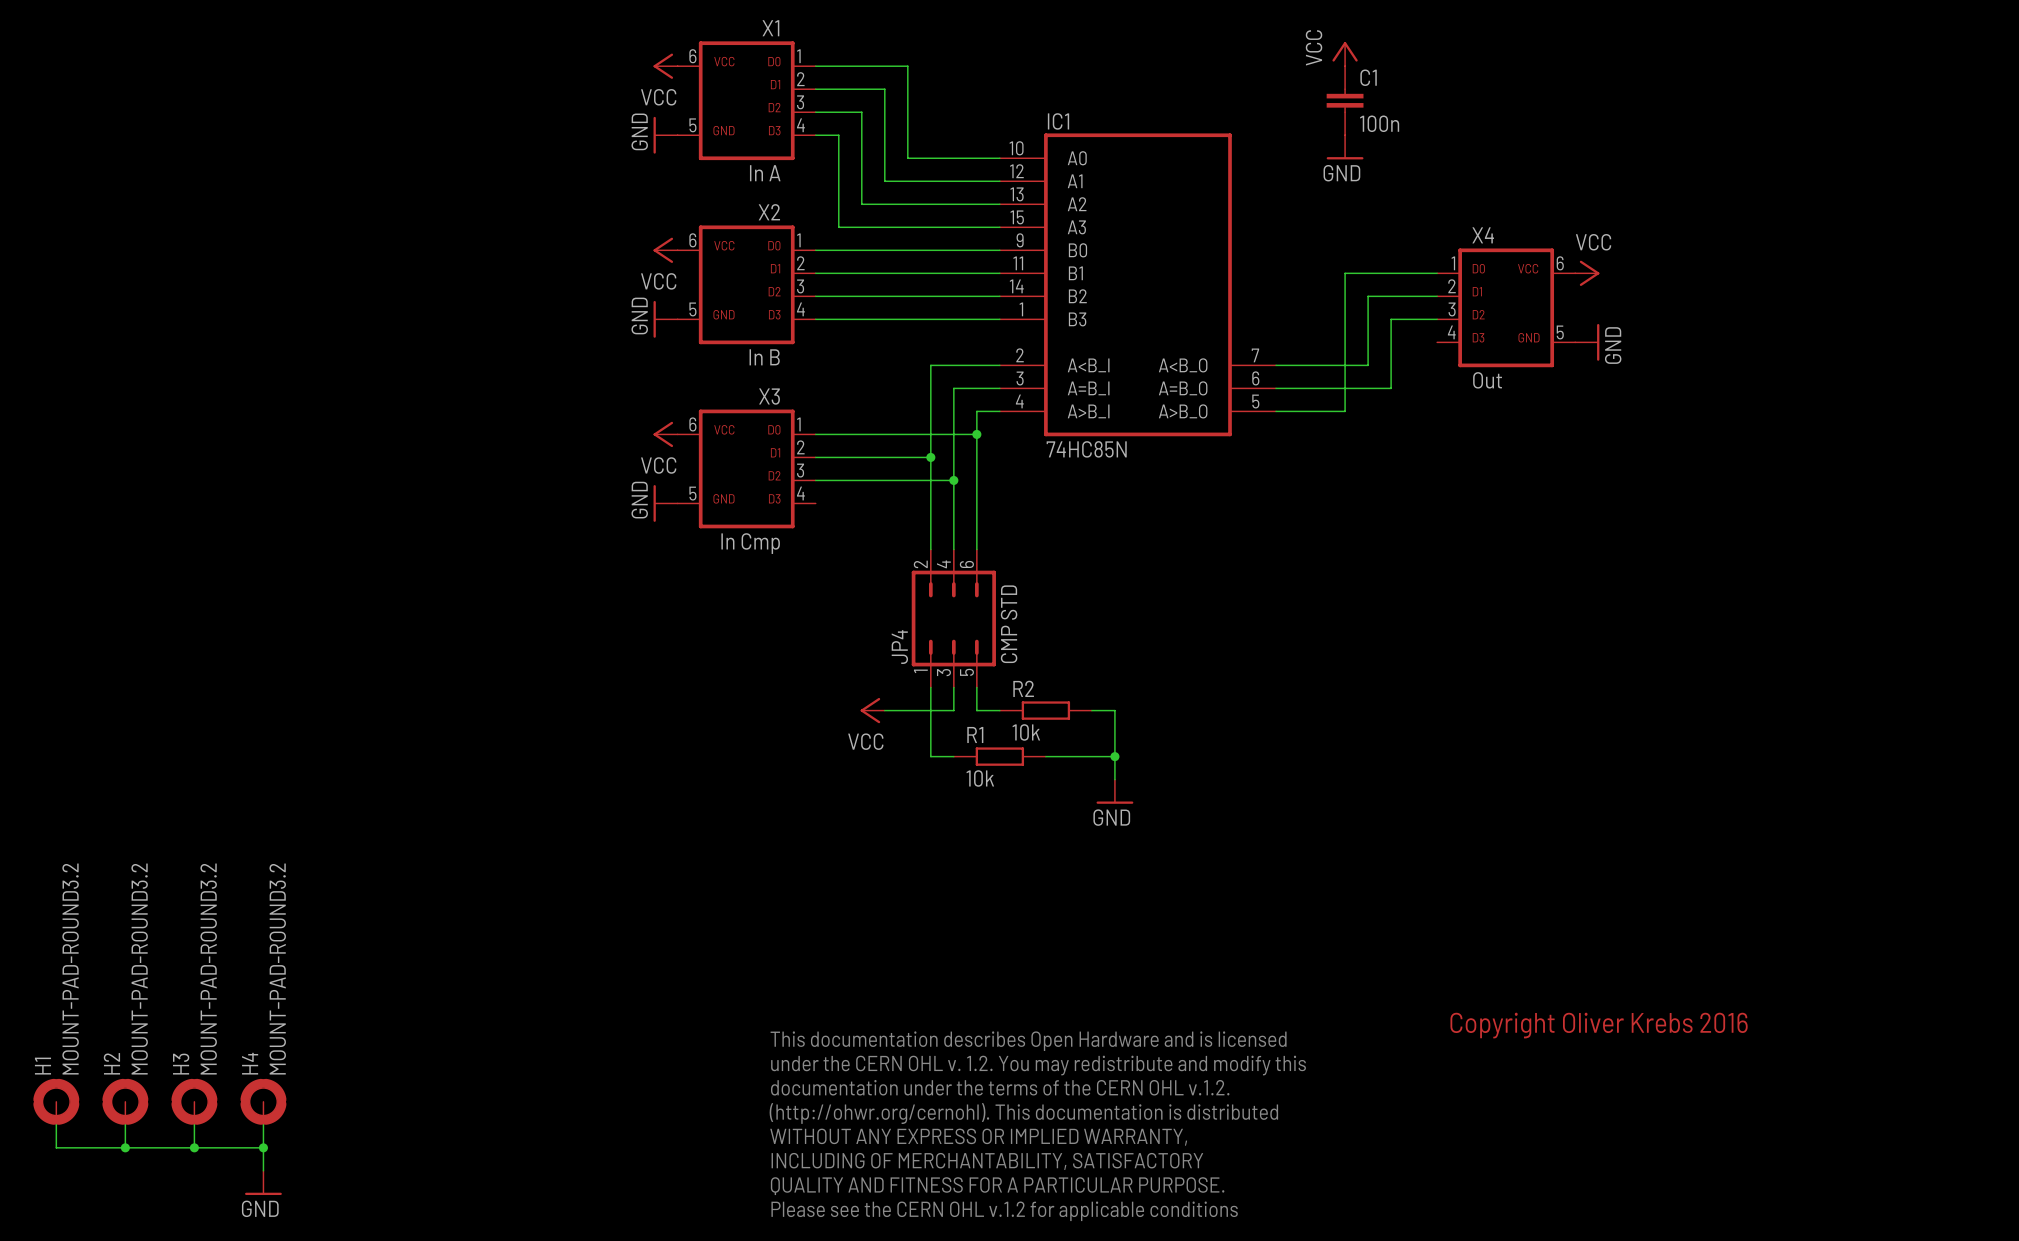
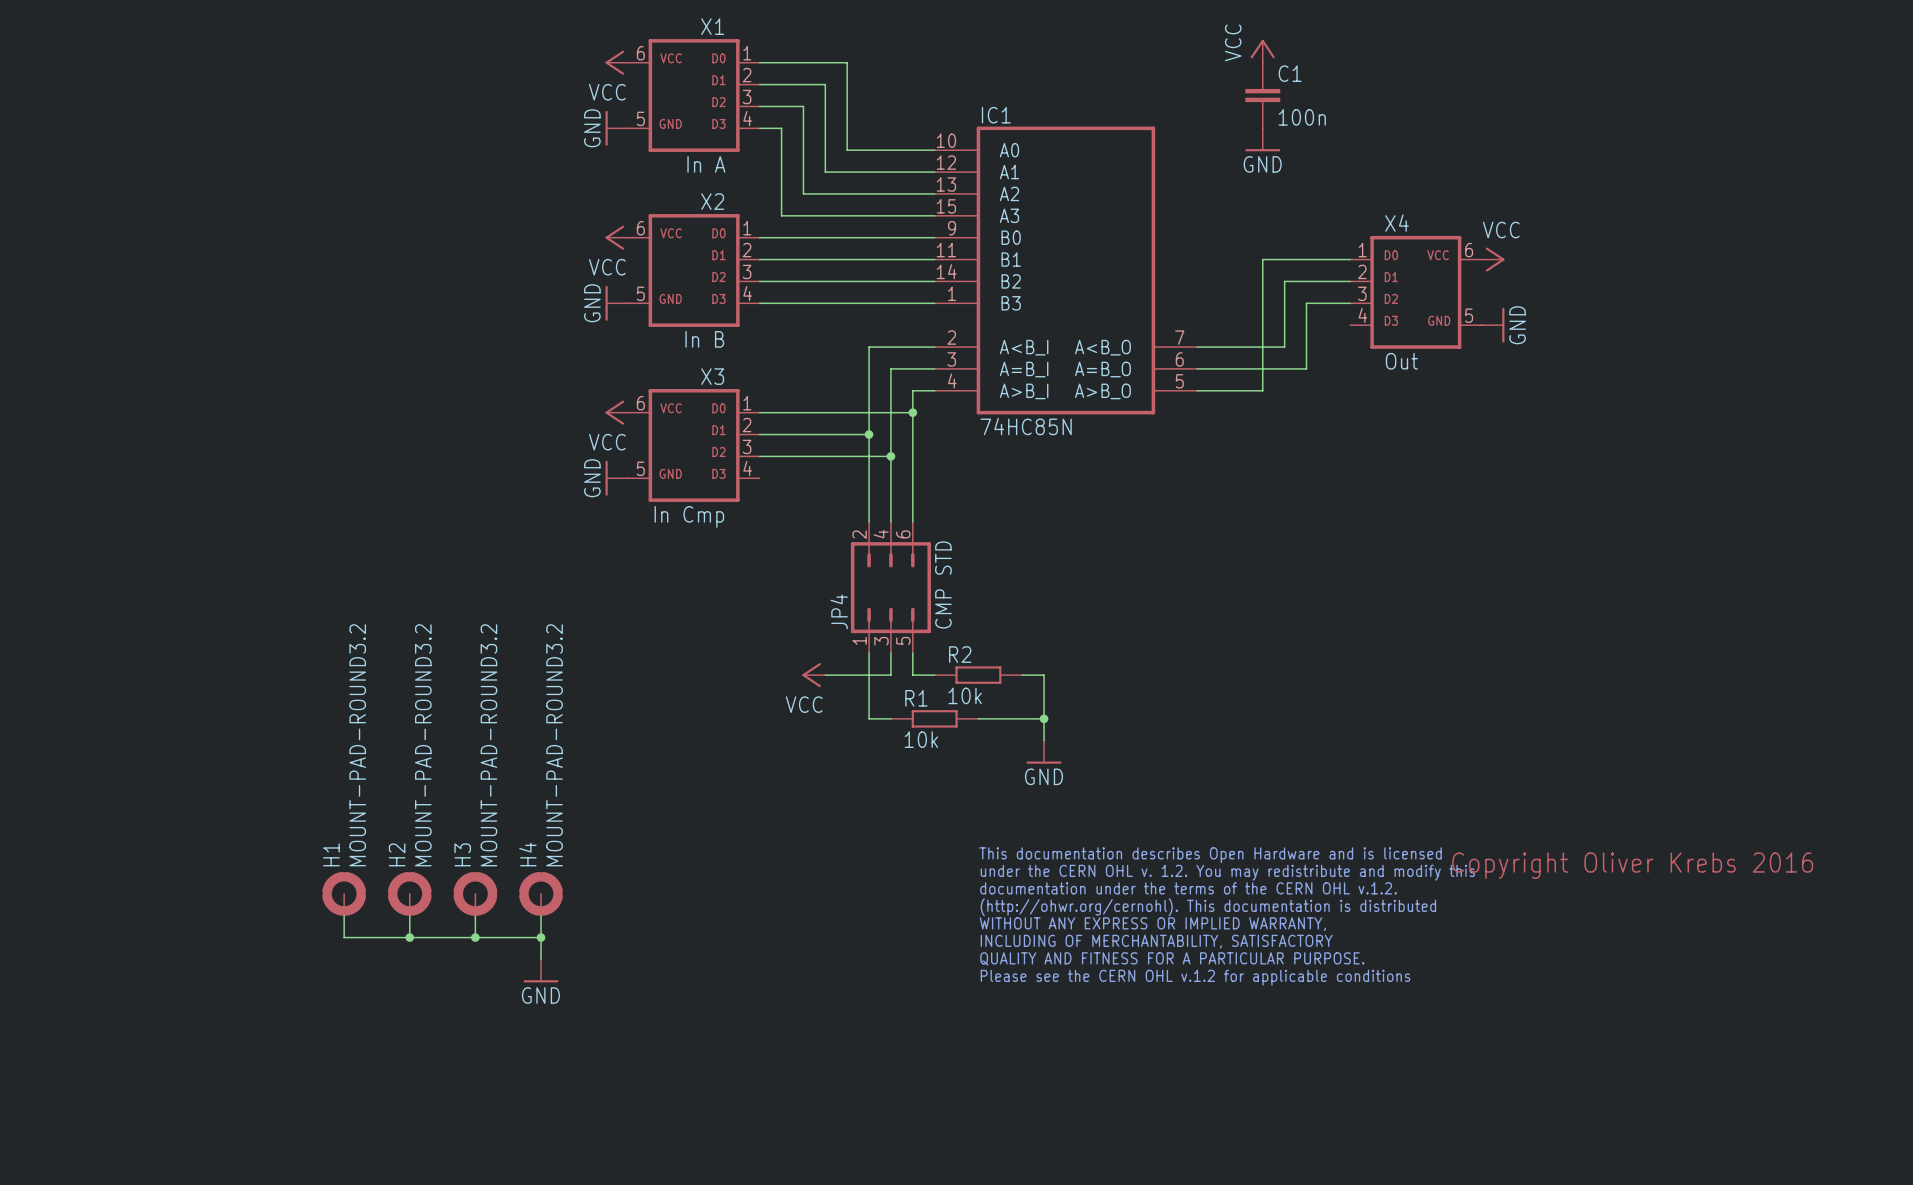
text: none -> This documentation describes Open Hardware and is licensed (1210, 855)
text: none -> under the CERN OHL v. 1.2. You may redistribute and modify this (1227, 872)
text: none -> documentation under the terms of the CERN OHL v.1.2. (1188, 888)
text: none -> (http://ohwr.org/cernohl). This documentation is distributed (1208, 907)
wire: none -> (344, 915) (344, 937) (541, 937)
wire: none -> (409, 915) (409, 937)
wire: none -> (475, 915) (475, 937)
wire: none -> (541, 915) (541, 959)
text: none -> WITHOUT ANY EXPRESS OR IMPLIED WARRANTY, (1152, 924)
junction: none -> (409, 937)
junction: none -> (475, 937)
junction: none -> (541, 937)
text: none -> INCLUDING OF MERCHANTABILITY, SATISFACTORY (1156, 941)
text: none -> QUALITY AND FITNESS FOR A PARTICULAR PURPOSE. (1172, 958)
power symbol: none -> GND (541, 970)
text position: Copyright Oliver Krebs 2016 (1599, 1025) -> Copyright Oliver Krebs 2016 (1632, 865)
text: none -> Please see the CERN OHL v.1.2 for applicable conditions (1195, 977)
text: This documentation describes Open Hardware and is licensed (1028, 1041) -> none
text: under the CERN OHL v. 1.2. You may redistribute and modify this (1038, 1065) -> none
text: documentation under the terms of the CERN OHL v.1.2. (1000, 1087) -> none
H1 position: (56, 1101) -> (344, 893)
H2 position: (125, 1101) -> (409, 893)
H3 position: (194, 1101) -> (475, 893)
H4 position: (263, 1101) -> (541, 893)
text: (http://ohwr.org/cernohl). This documentation is distributed (1023, 1113) -> none
wire: (56, 1124) (56, 1147) (263, 1147) -> none
wire: (125, 1124) (125, 1147) -> none
wire: (194, 1124) (194, 1147) -> none
wire: (263, 1124) (263, 1170) -> none
text: WITHOUT ANY EXPRESS OR IMPLIED WARRANTY, (978, 1137) -> none
junction: (125, 1147) -> none
junction: (194, 1147) -> none
junction: (263, 1147) -> none
text: INCLUDING OF MERCHANTABILITY, SATISFACTORY (987, 1161) -> none
power symbol: GND (263, 1182) -> none
text: QUALITY AND FITNESS FOR A PARTICULAR PURPOSE. (997, 1186) -> none
text: Please see the CERN OHL v.1.2 for applicable conditions (1004, 1211) -> none

